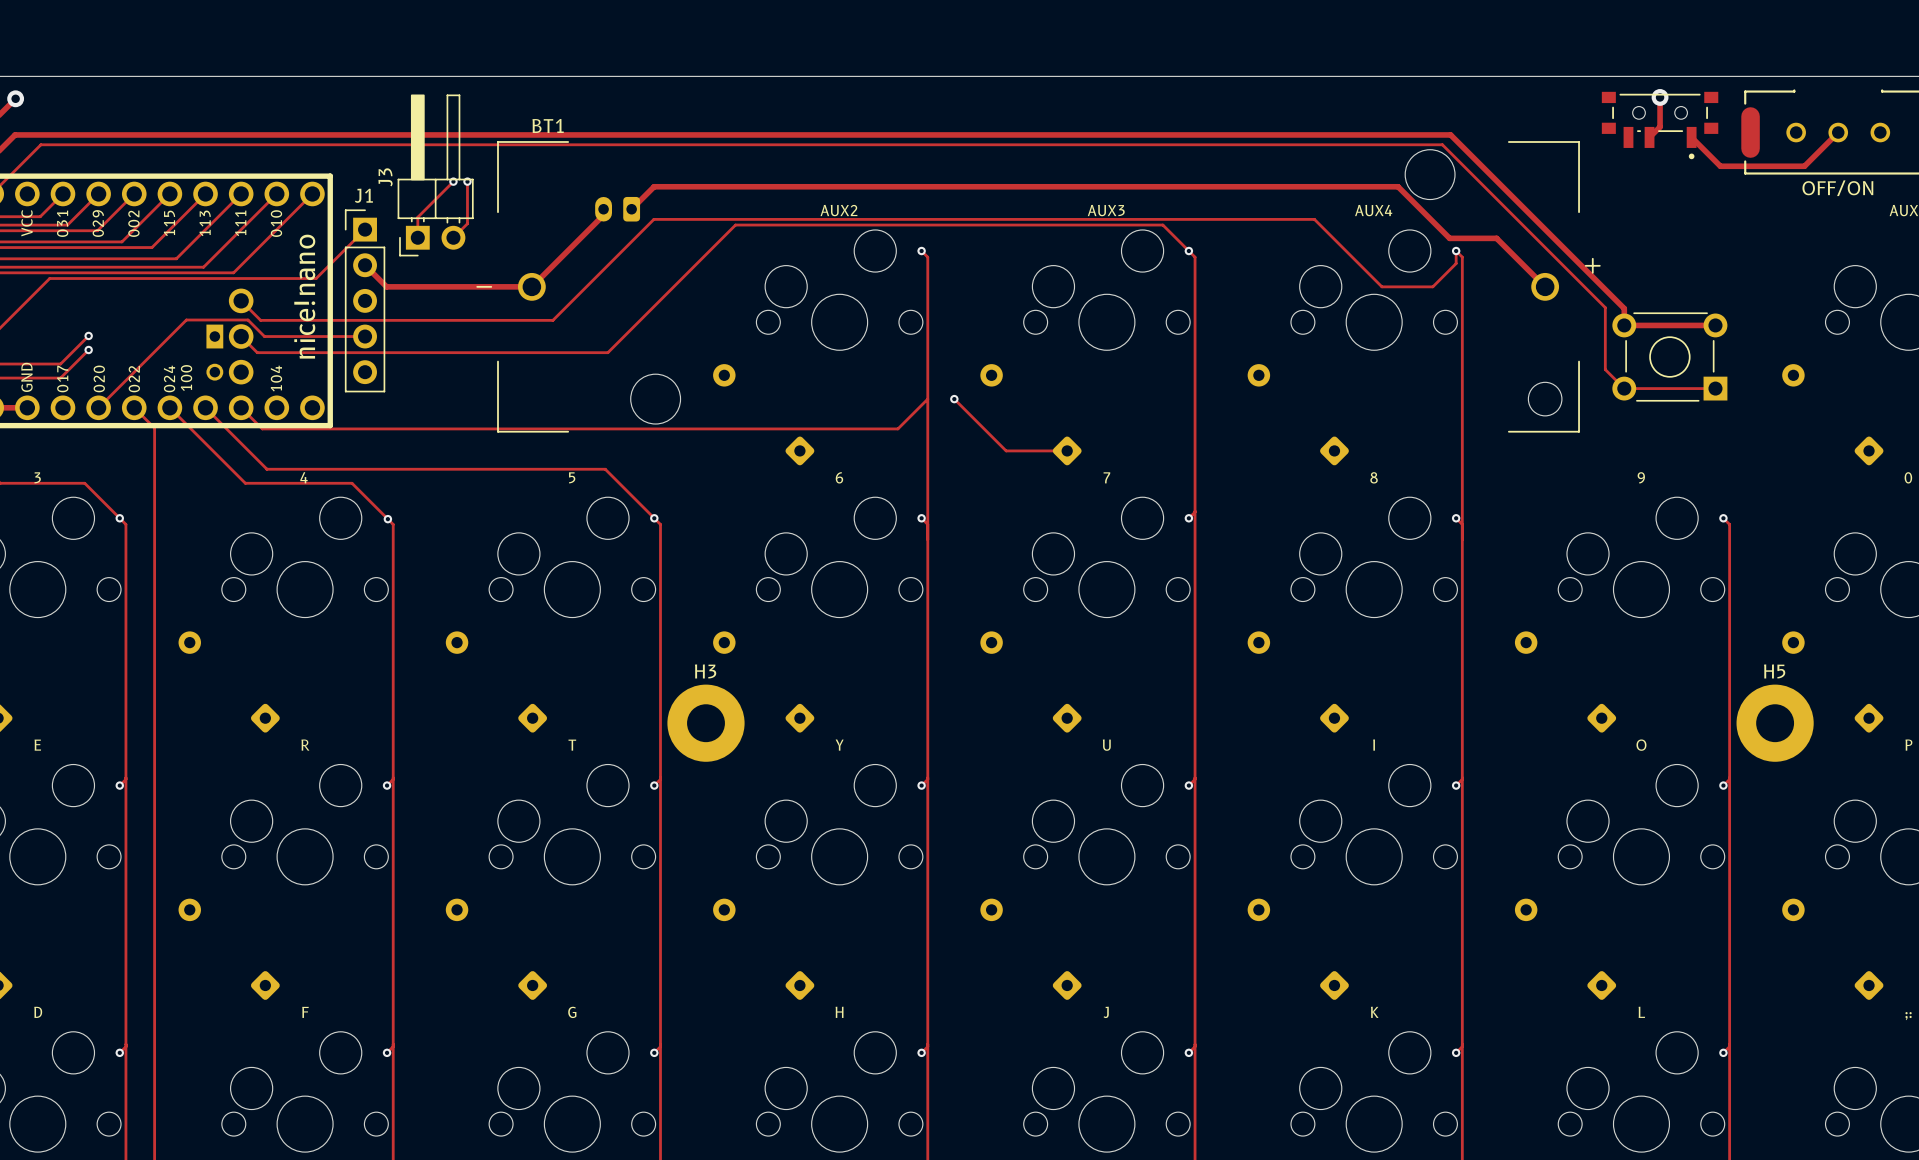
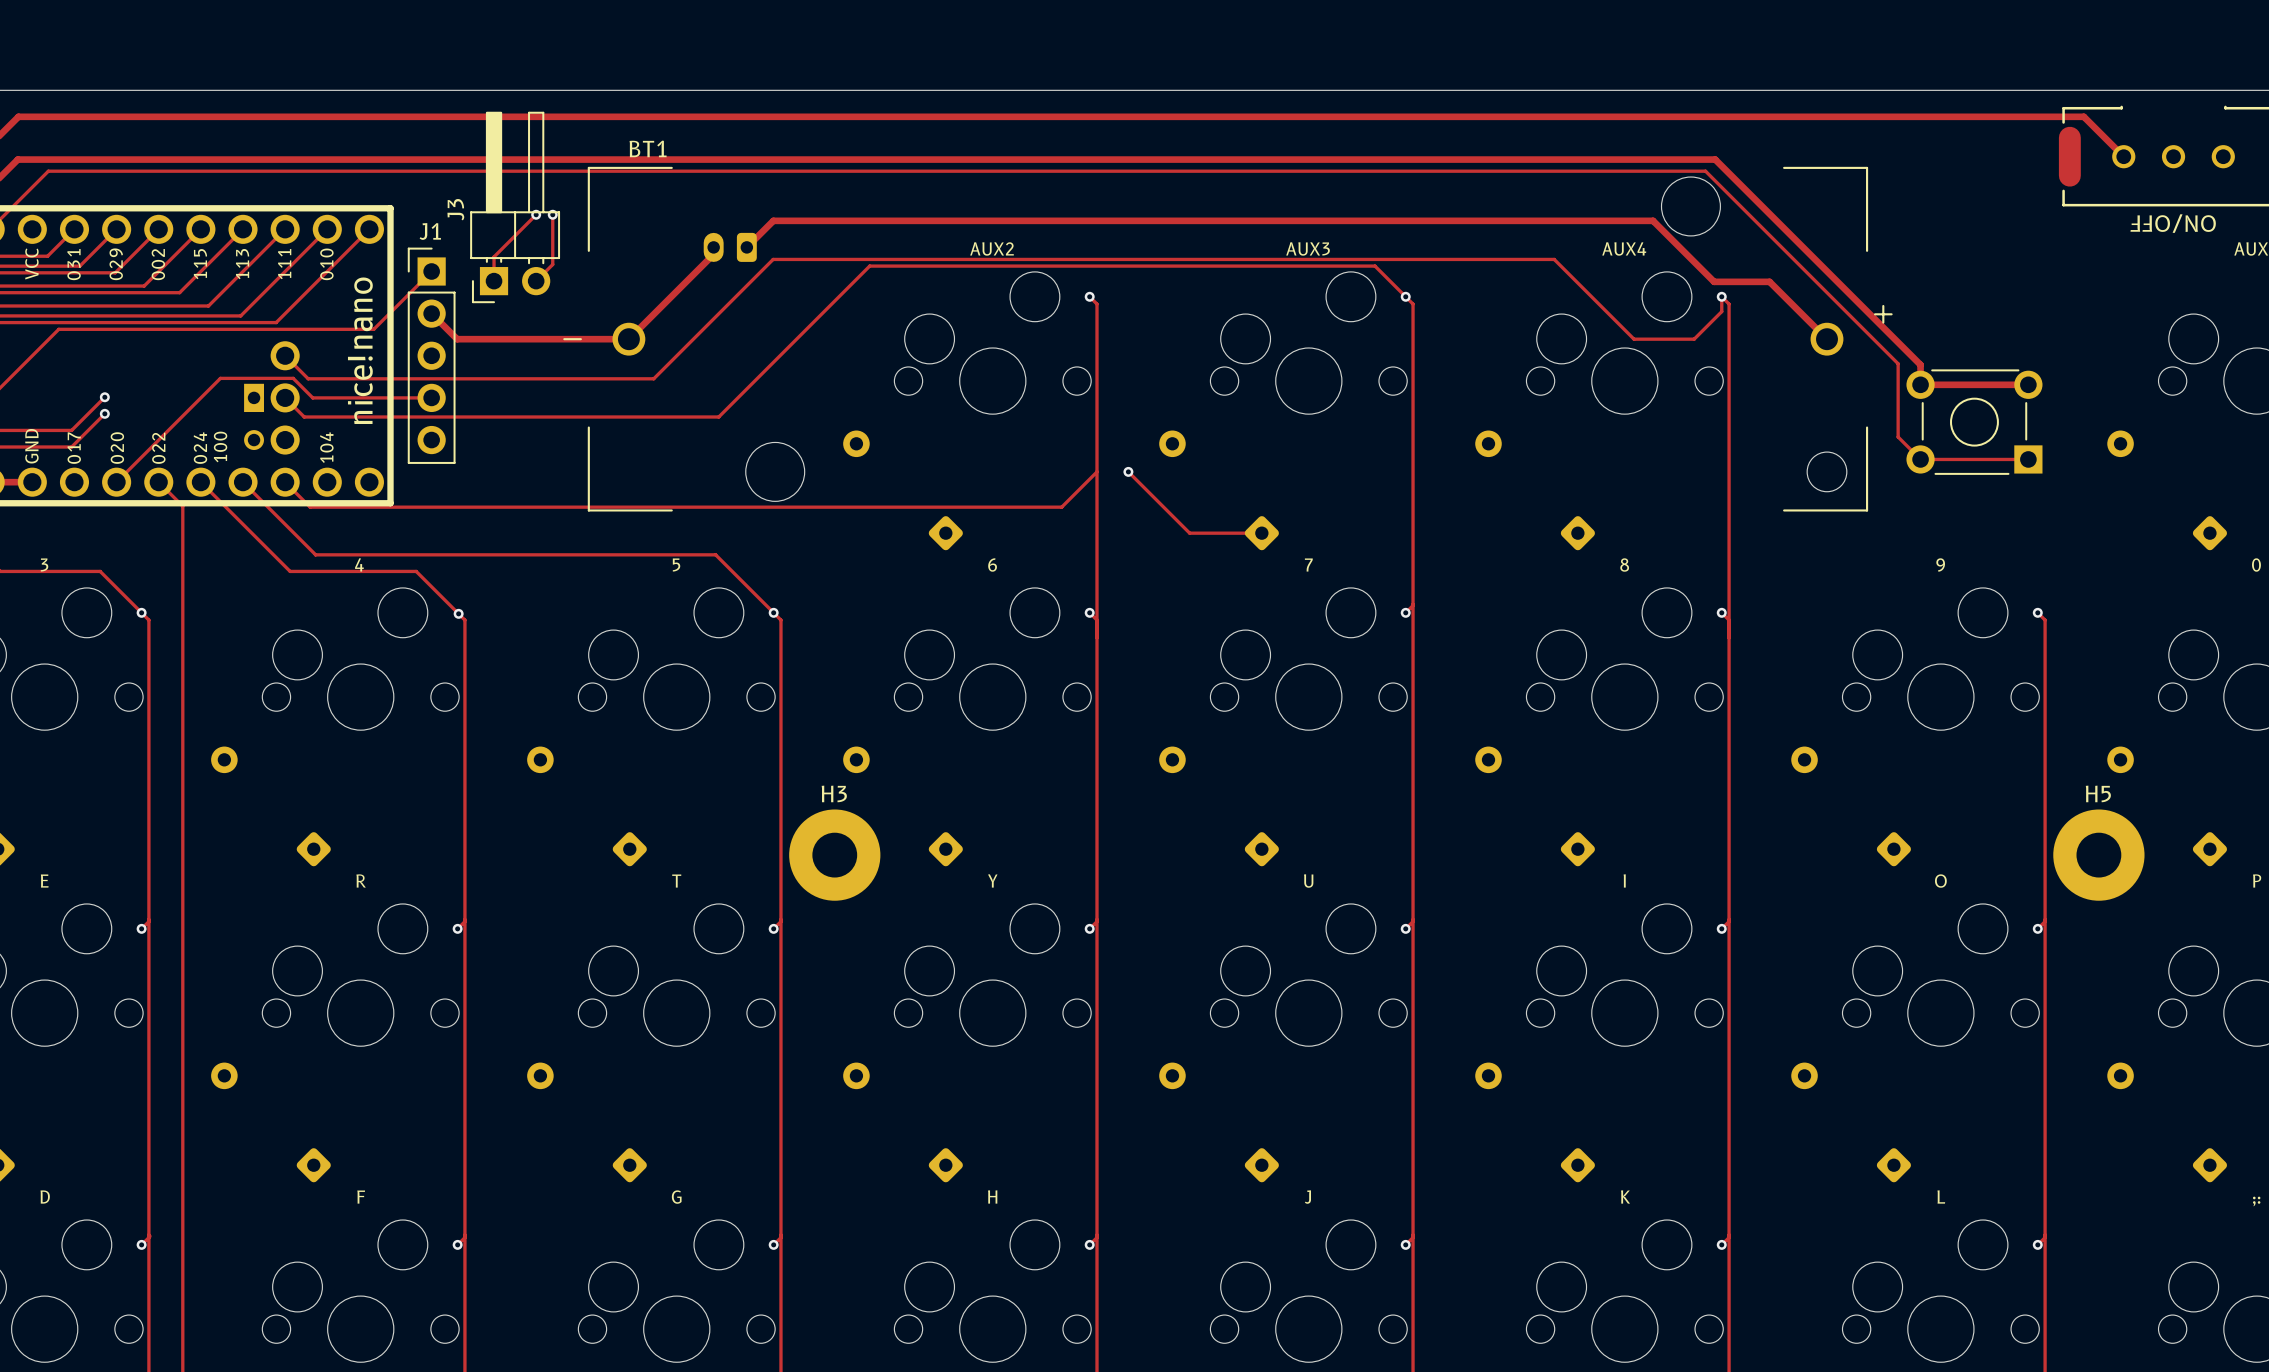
track: (1660, 97) (1660, 126) (1649, 137) -> none
via: (1660, 97) -> none
track: none -> (18, 116) (2083, 116) (2123, 156)
via: (15, 98) -> none
part: (1660, 125) -> none
track: (1838, 132) (1804, 166) (1720, 166) (1691, 137) -> none
part value: OFF/ON (1837, 188) -> ON/OFF (2173, 223)

